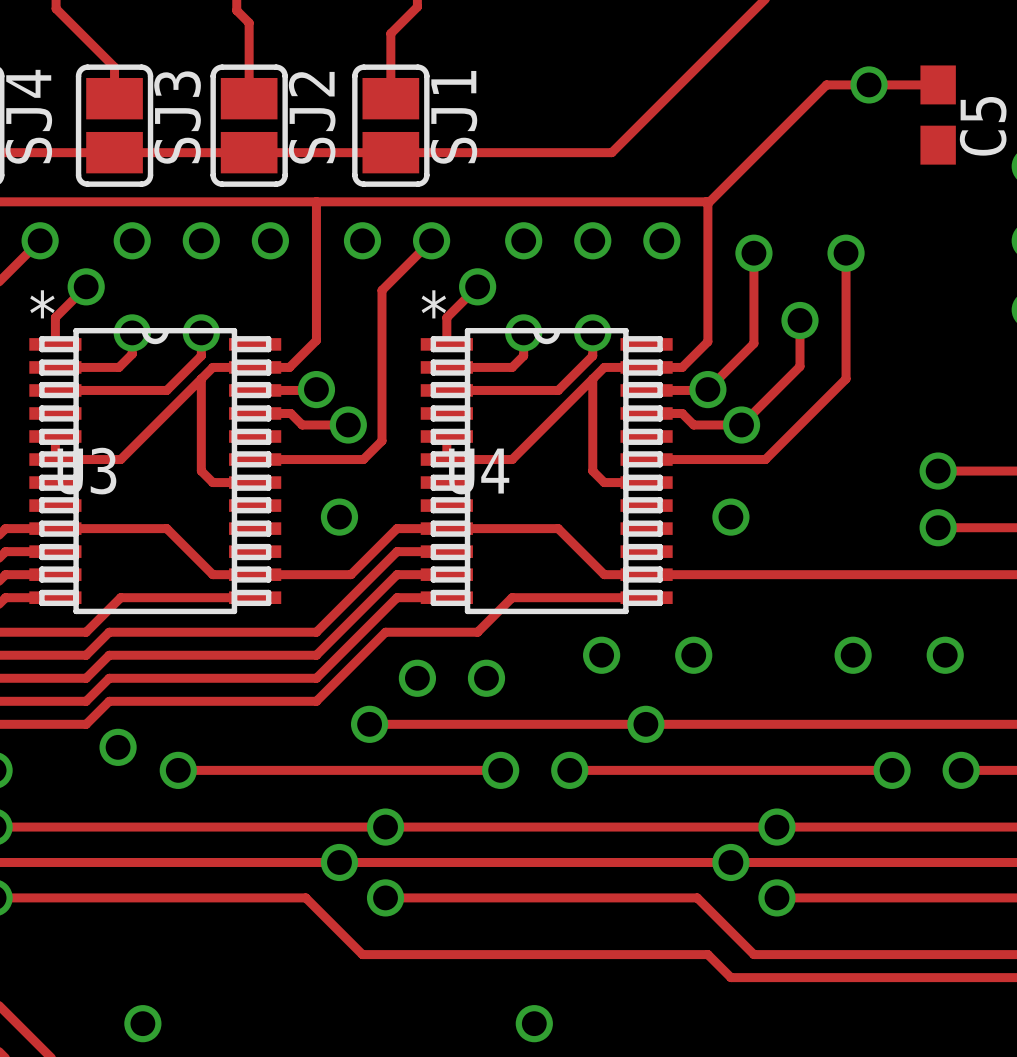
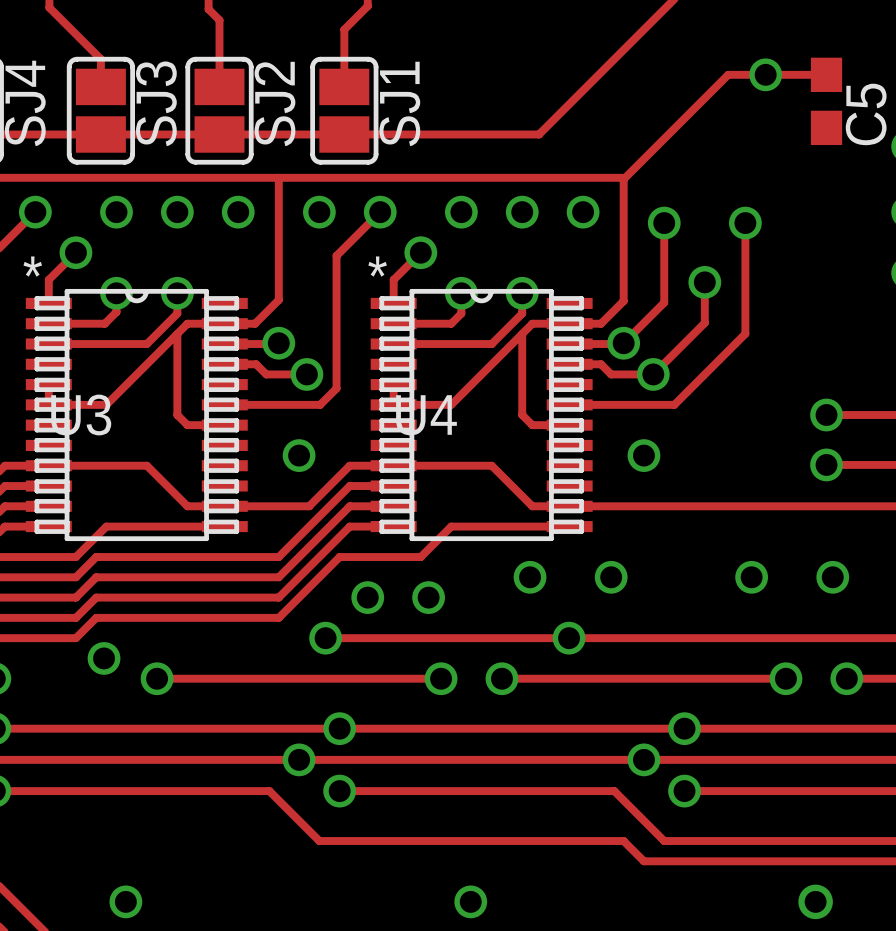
via: none -> (815, 901)

